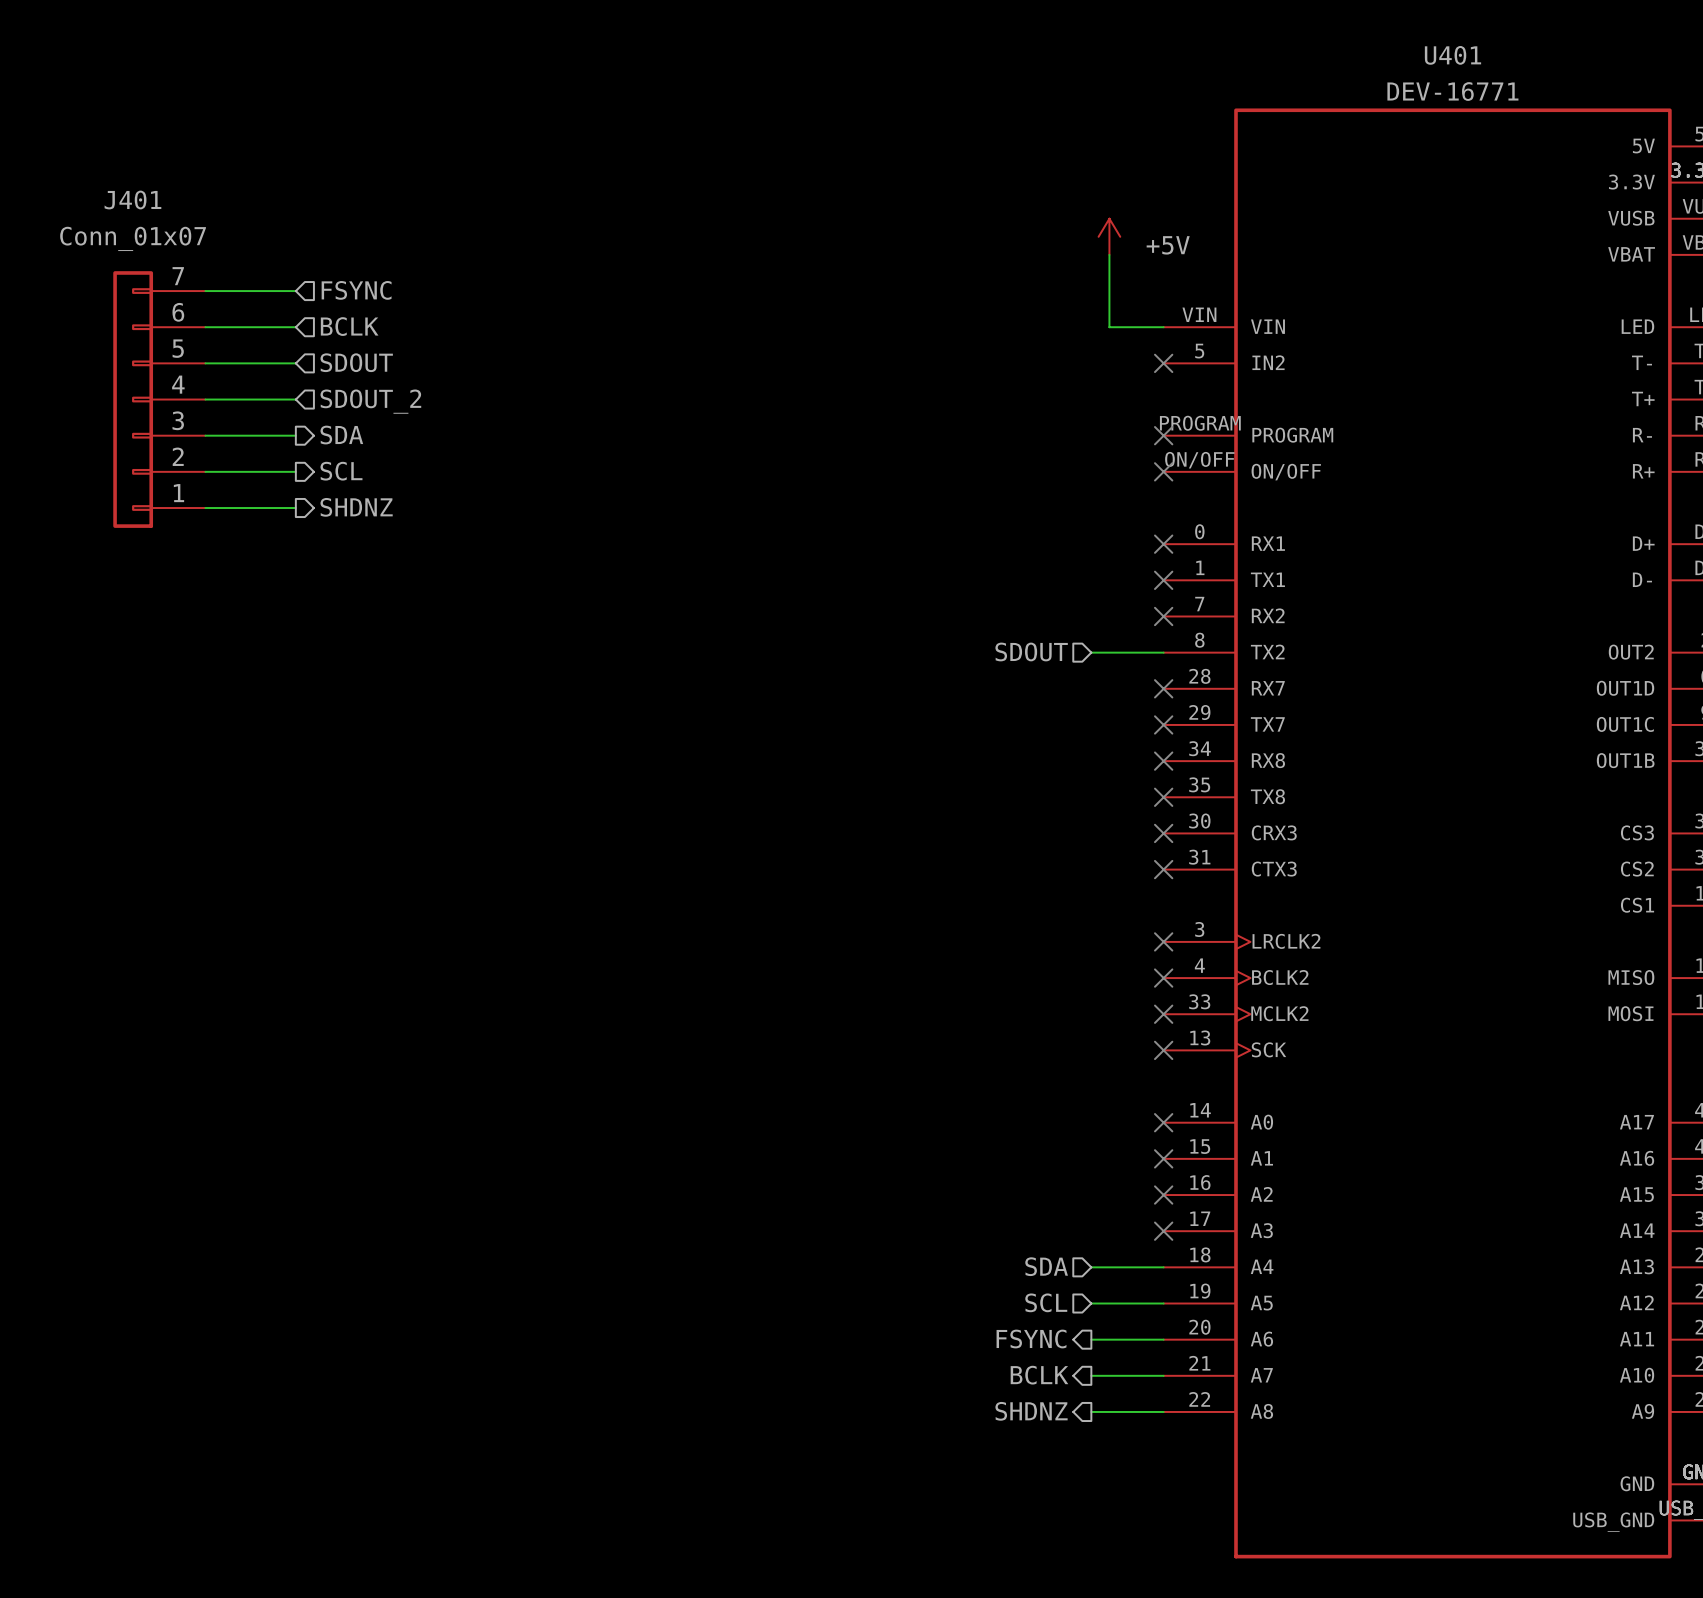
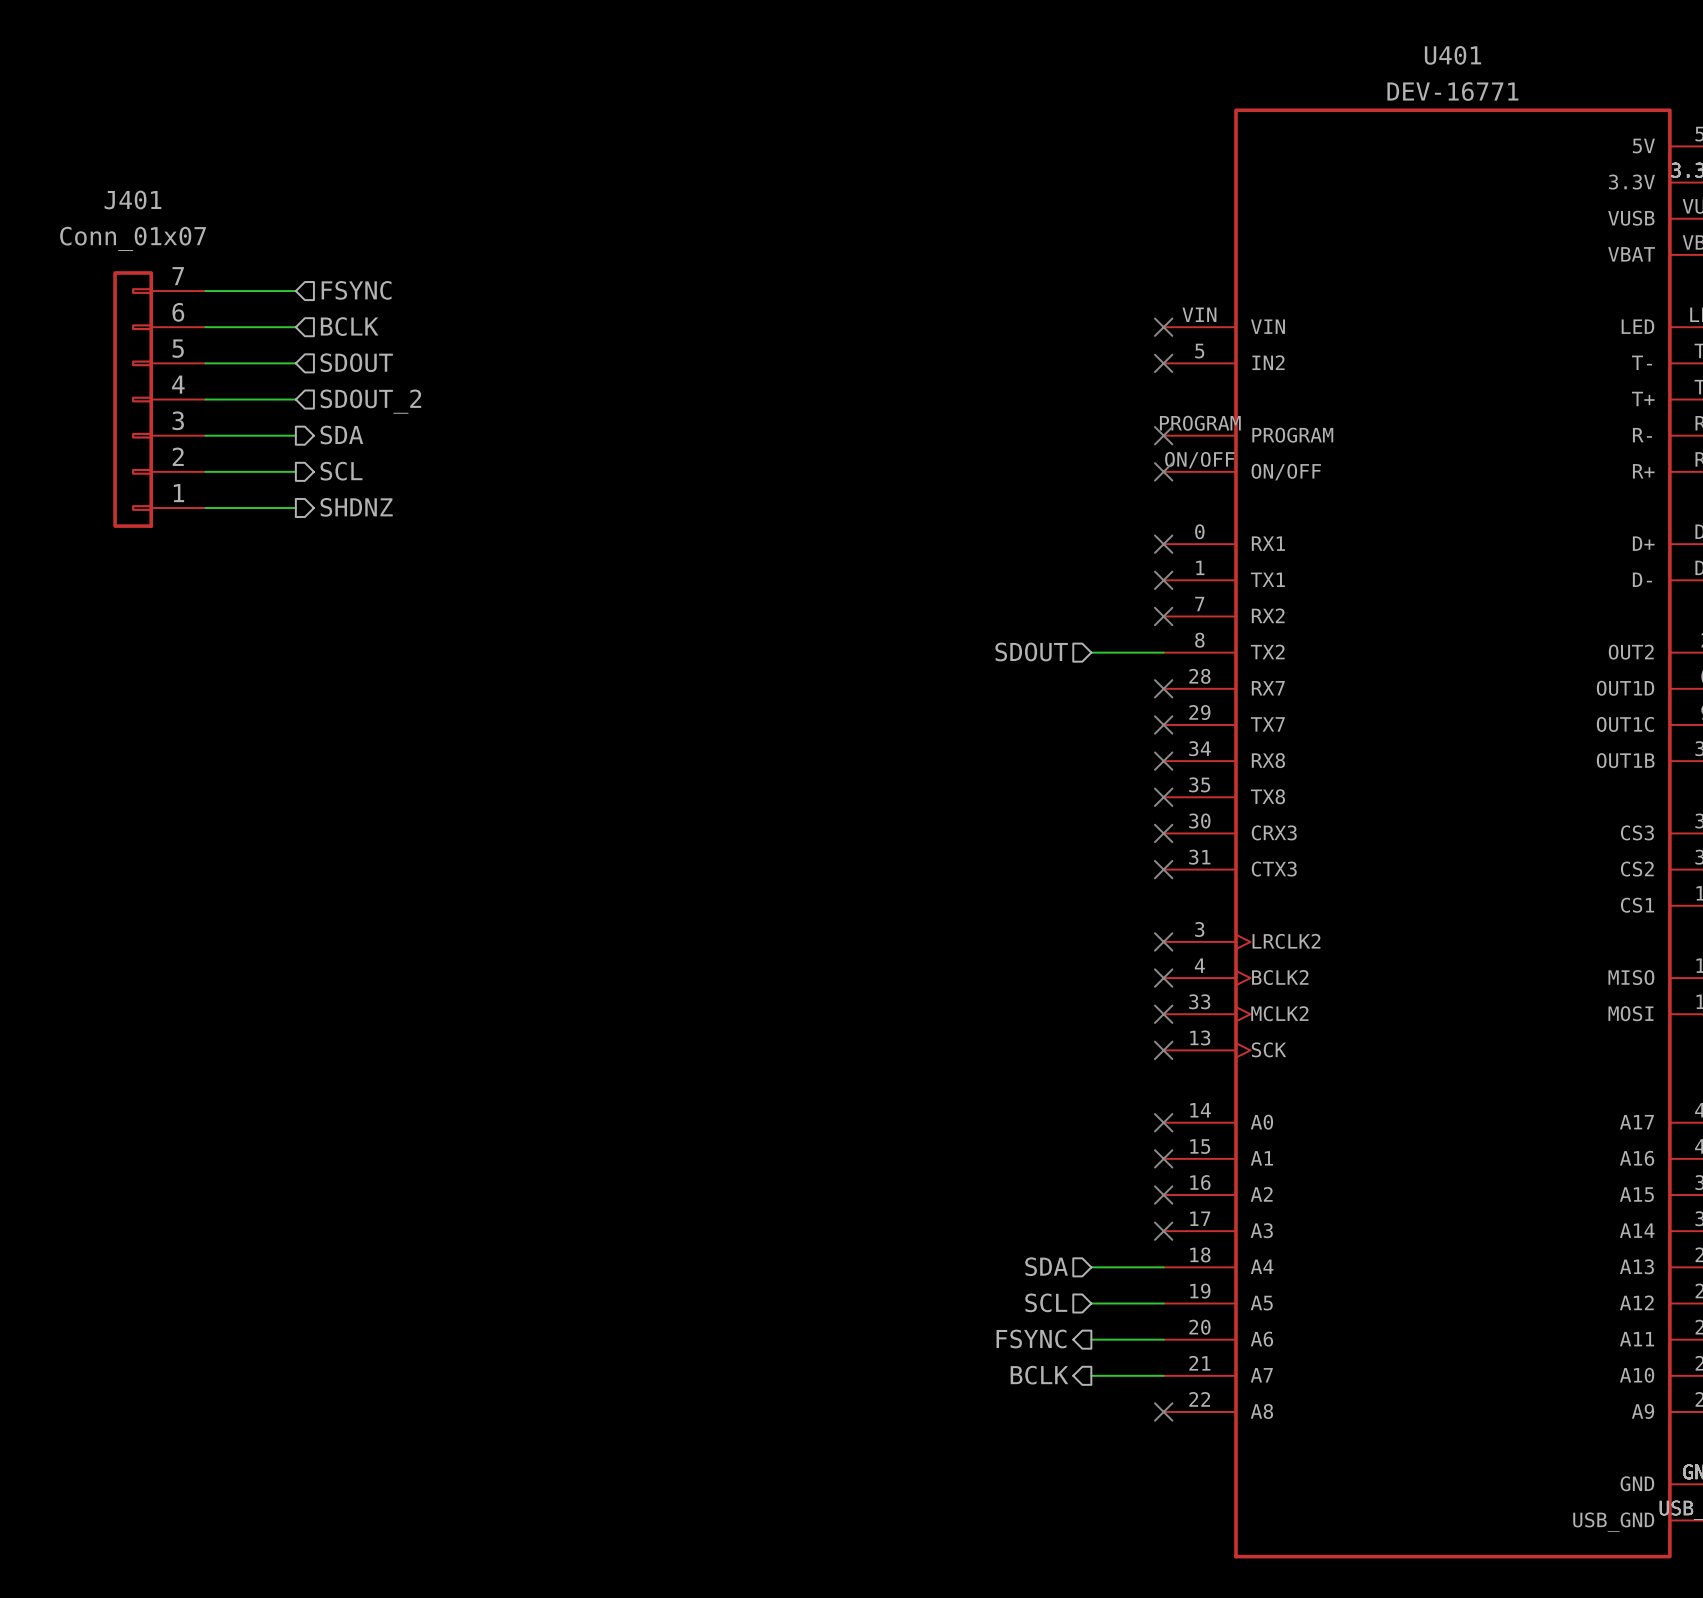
power symbol: +5V (1109, 236) -> none
wire: (1109, 254) (1109, 327) (1163, 327) -> none
no-connect mark: none -> (1163, 327)
hierarchical label: SHDNZ (1031, 1411) -> none
wire: (1091, 1411) (1163, 1411) -> none
no-connect mark: none -> (1163, 1411)

